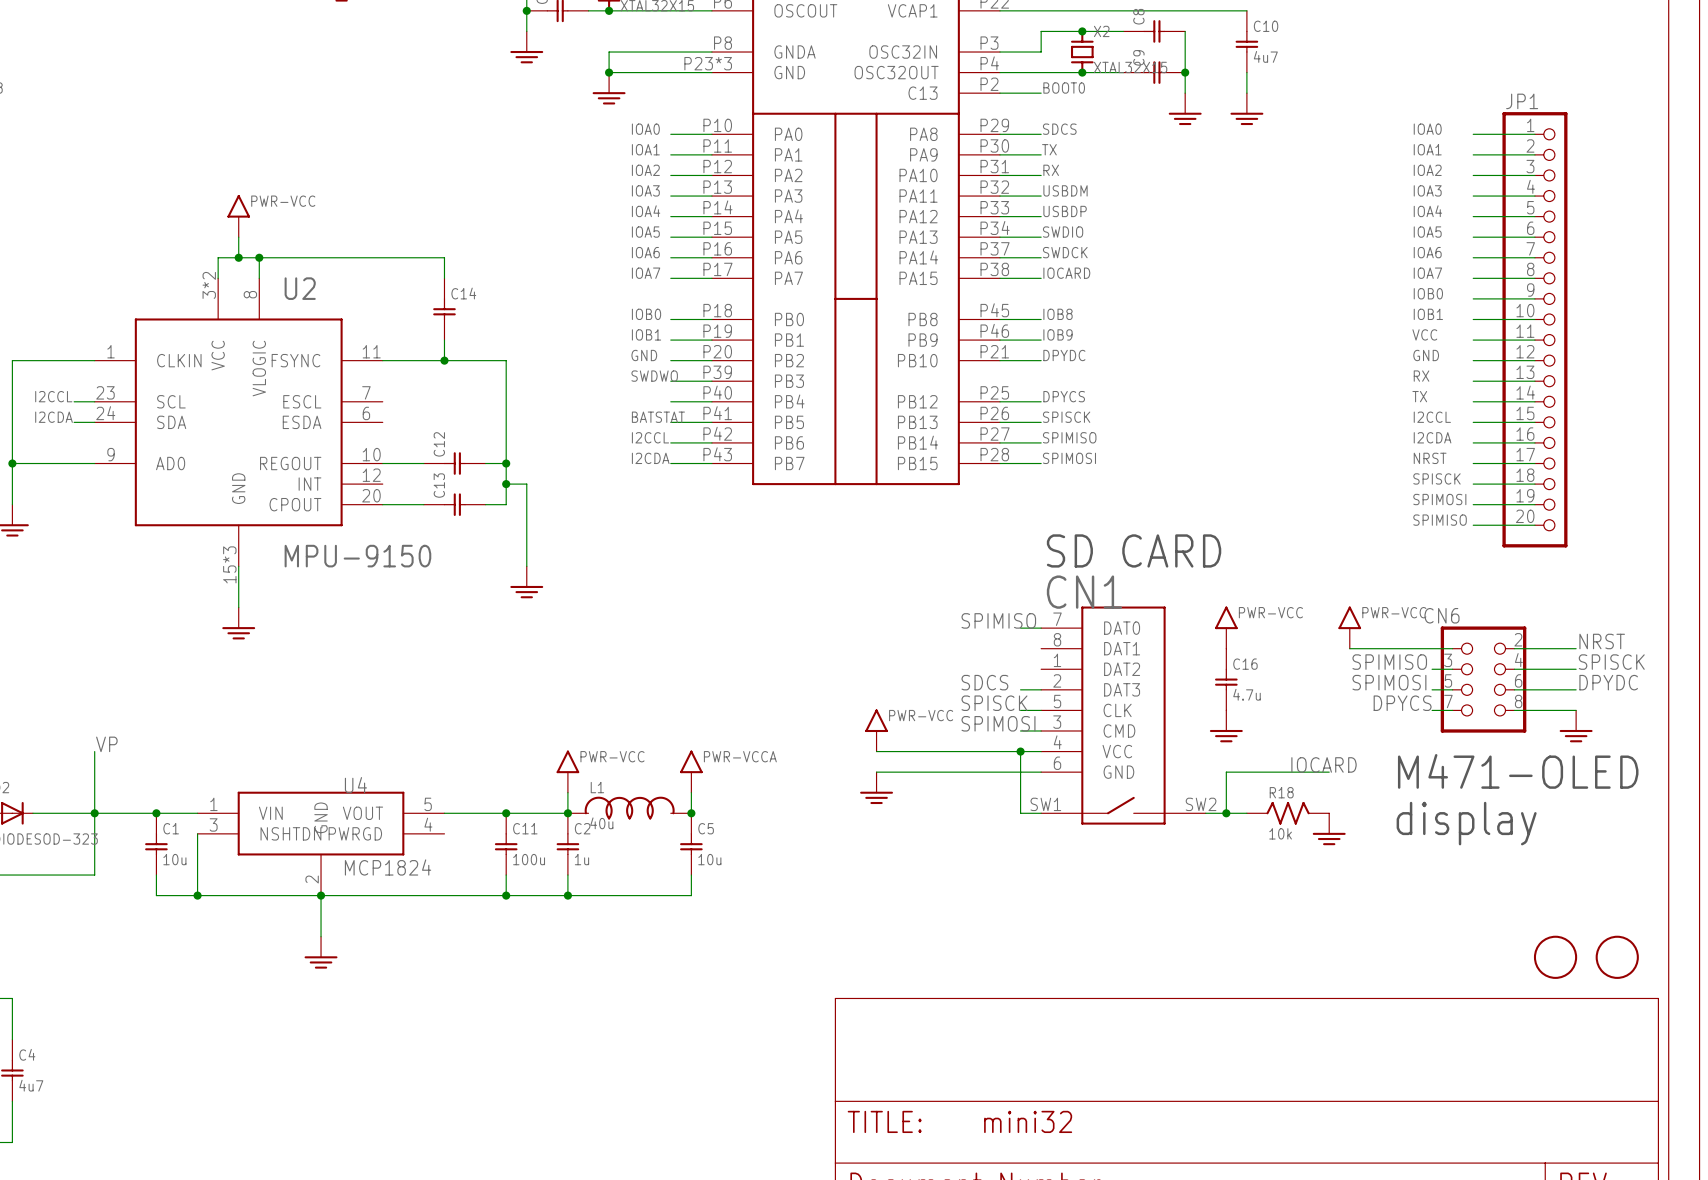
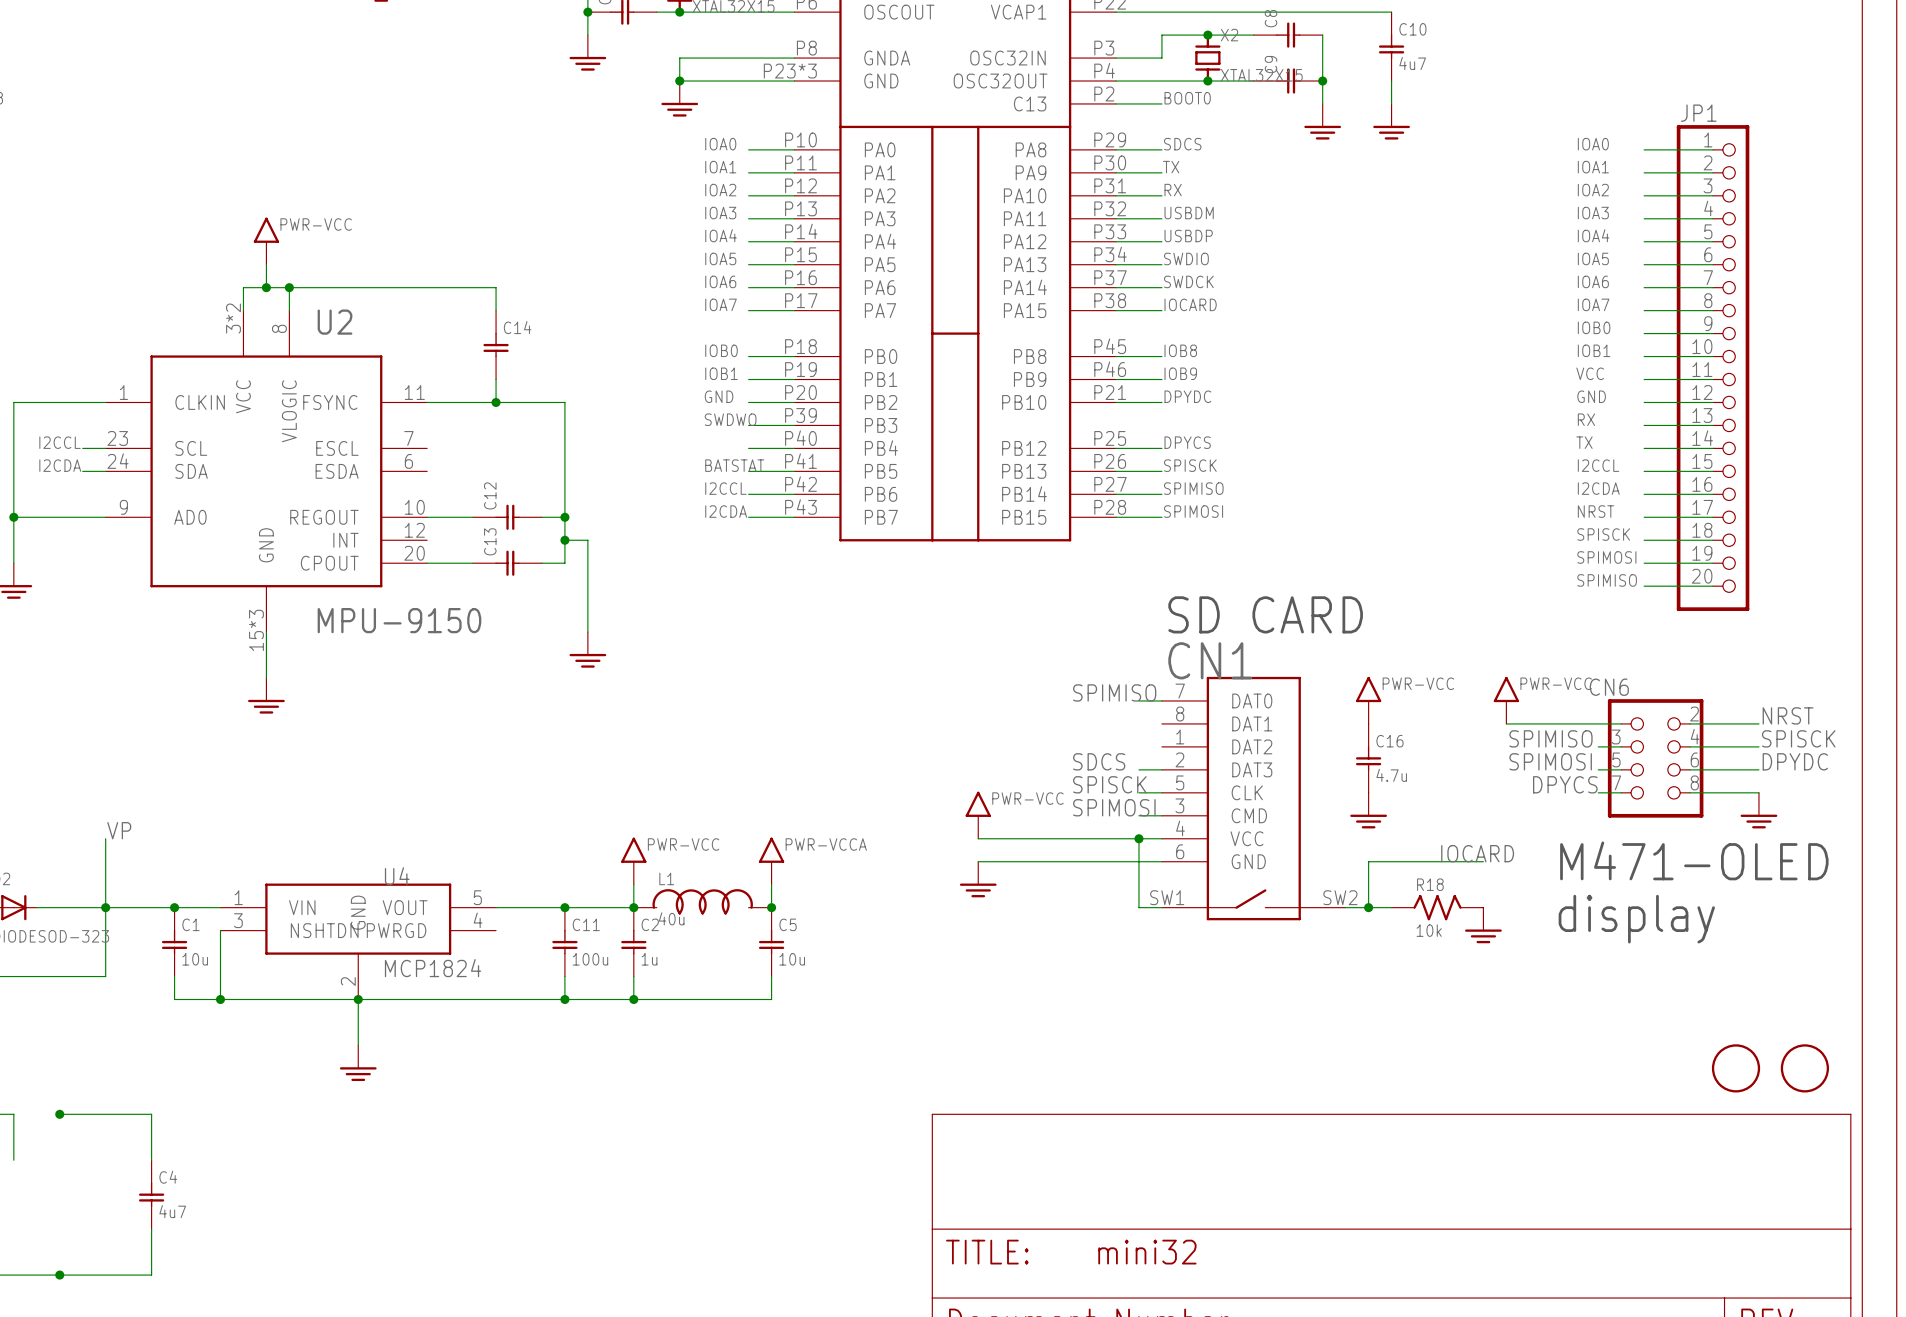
wire: none -> (59, 1114) (151, 1114) (151, 1160)
junction: none -> (59, 1114)
C4 position: (12, 1070) -> (151, 1194)
wire: (12, 1101) (12, 1142) -> (151, 1229) (151, 1275) (13, 1275)
junction: none -> (59, 1275)

